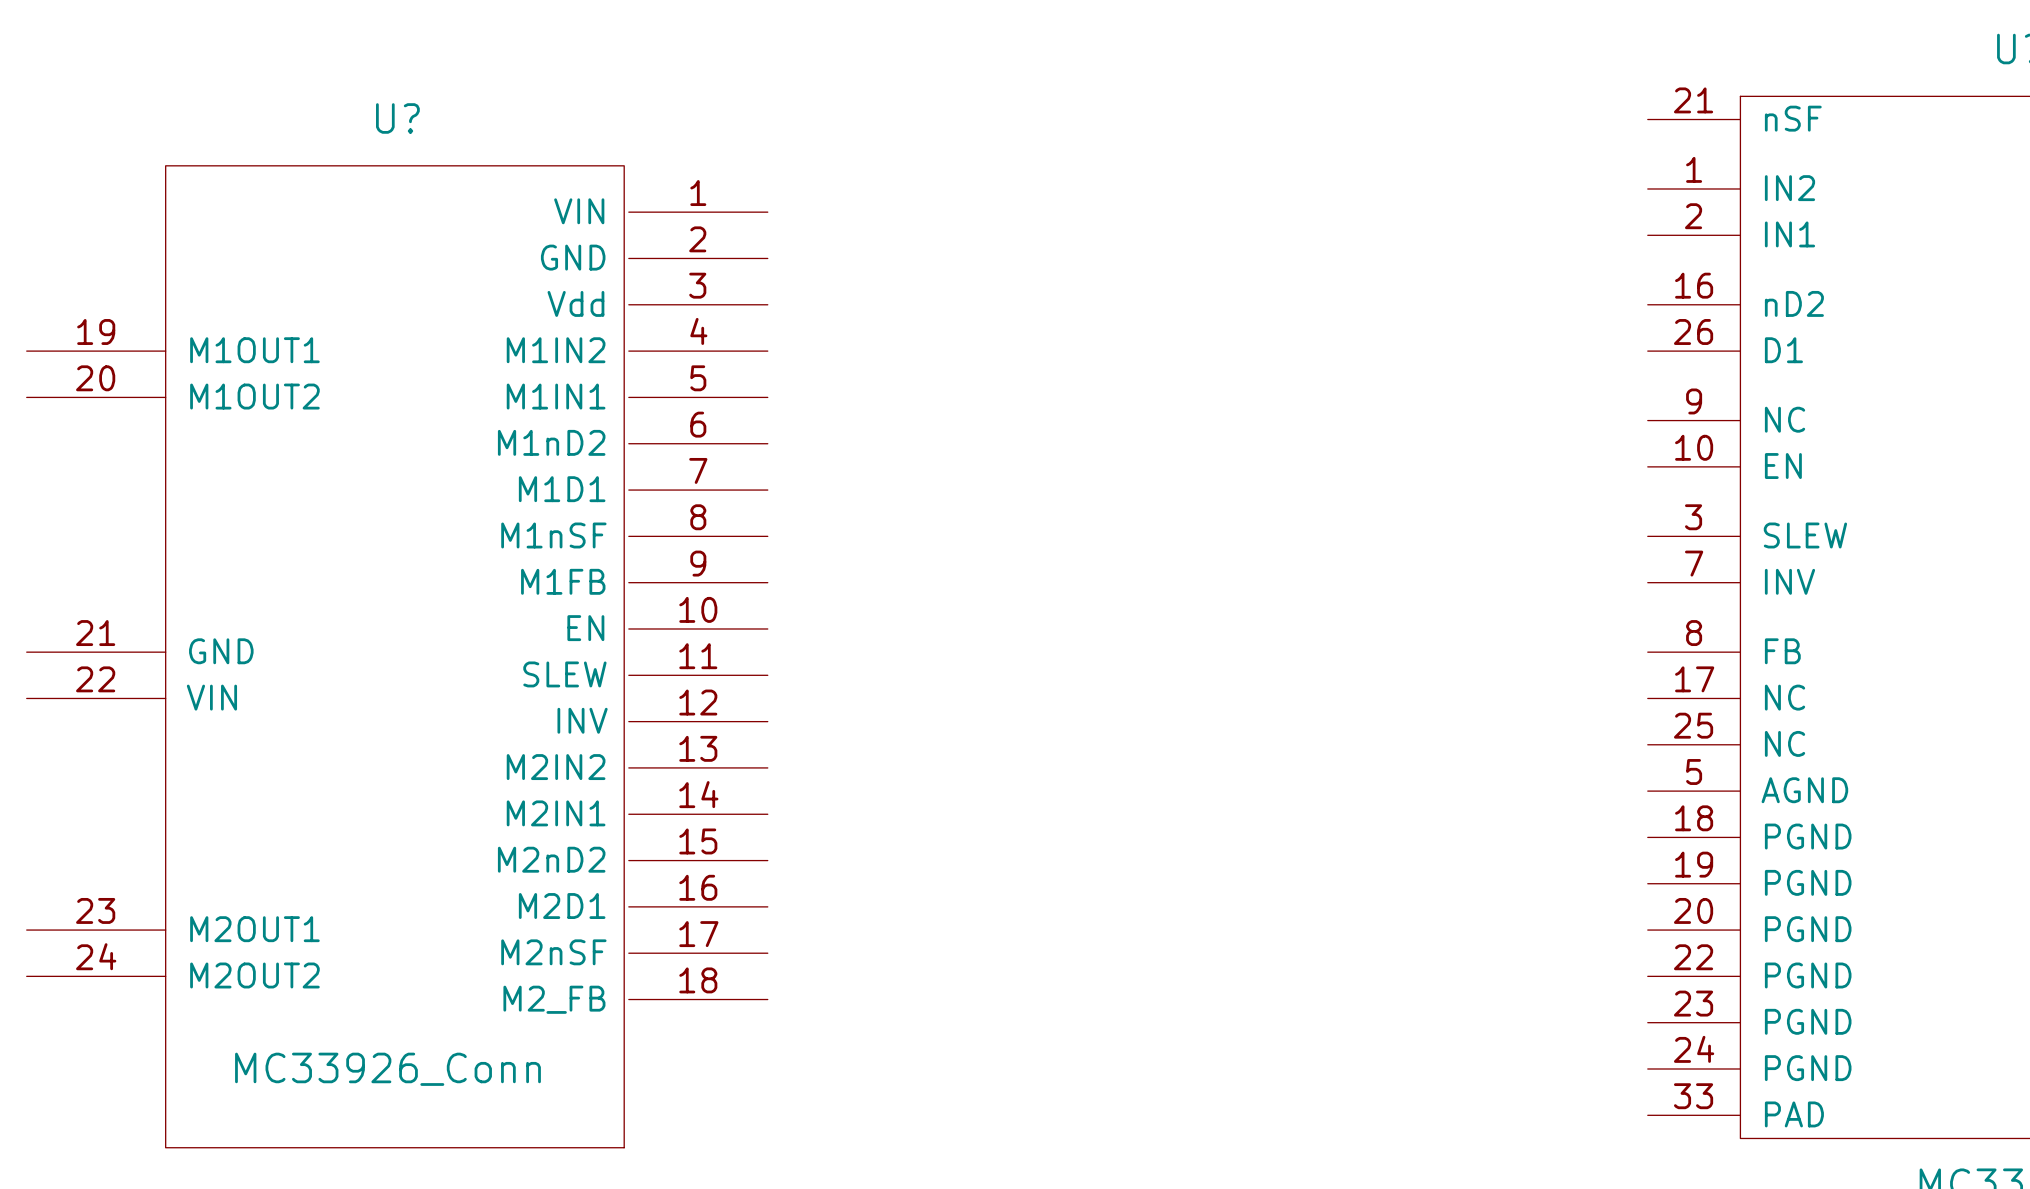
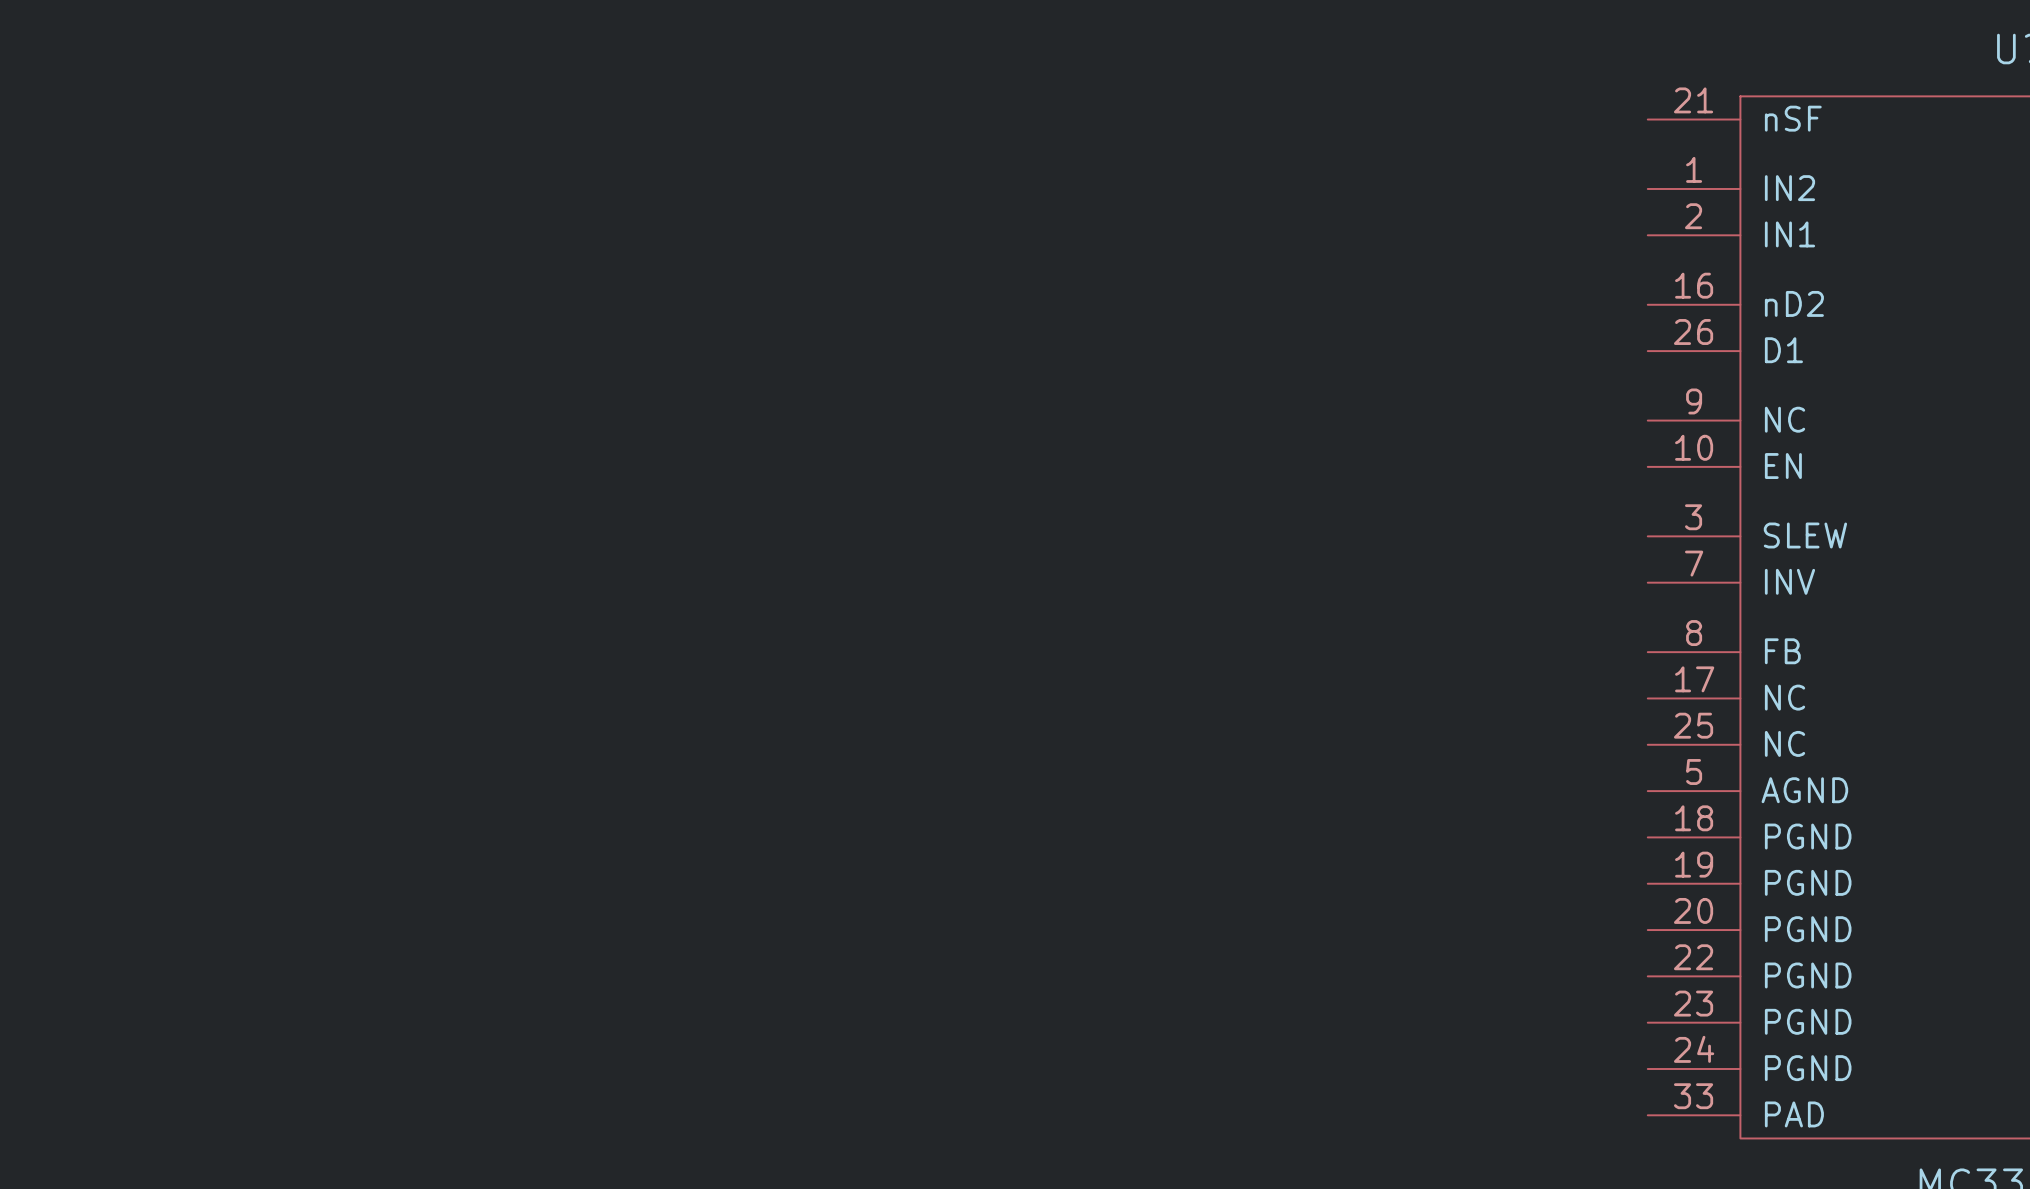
U?: MC33926_Conn (397, 656) -> none

